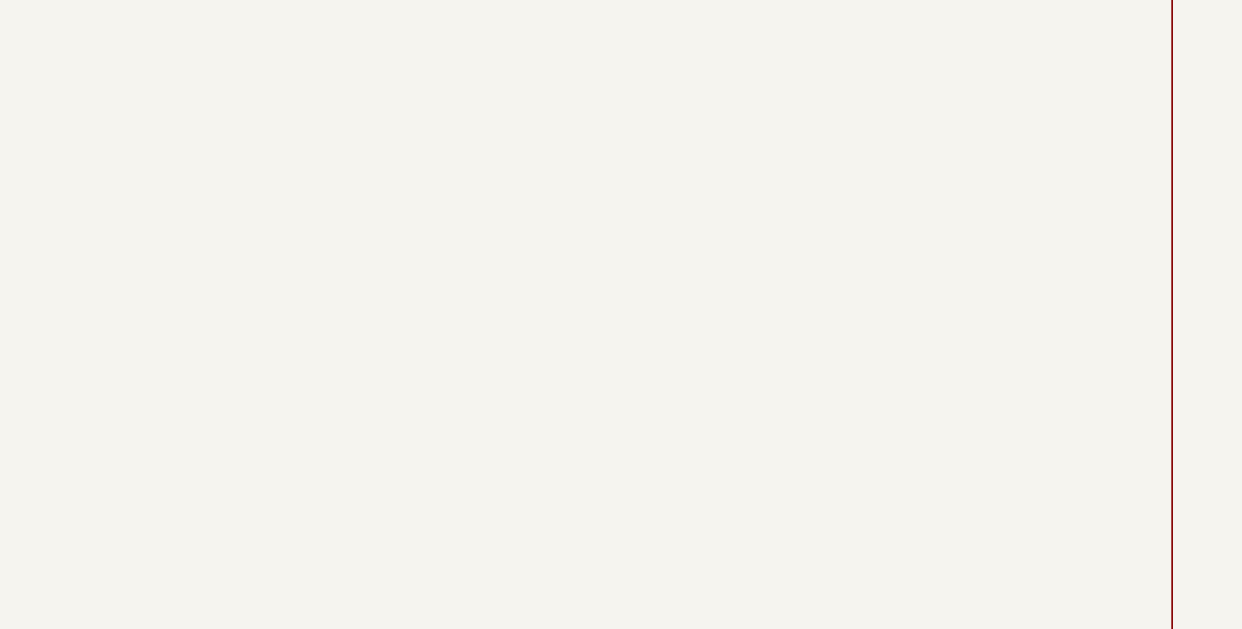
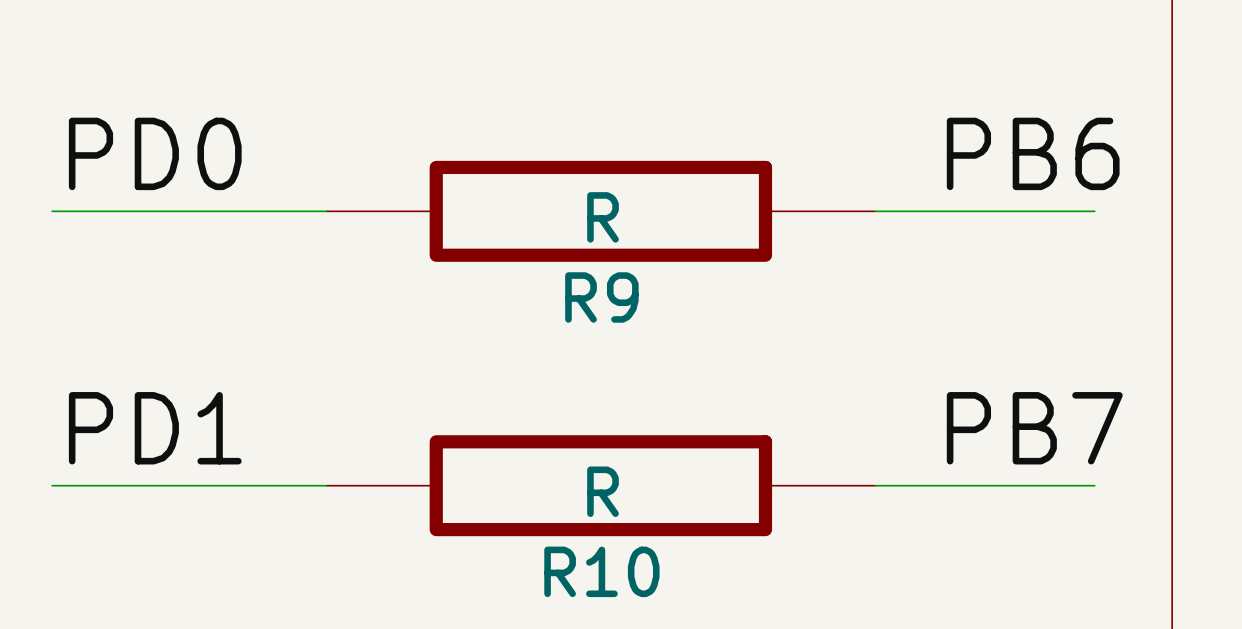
label: none -> PD0 (155, 153)
label: none -> PB6 (1033, 153)
wire: none -> (52, 211) (326, 211)
R9: none -> R (600, 211)
wire: none -> (875, 211) (1094, 211)
label: none -> PD1 (155, 428)
label: none -> PB7 (1034, 428)
wire: none -> (52, 485) (326, 485)
R10: none -> R (600, 485)
wire: none -> (875, 485) (1094, 485)

